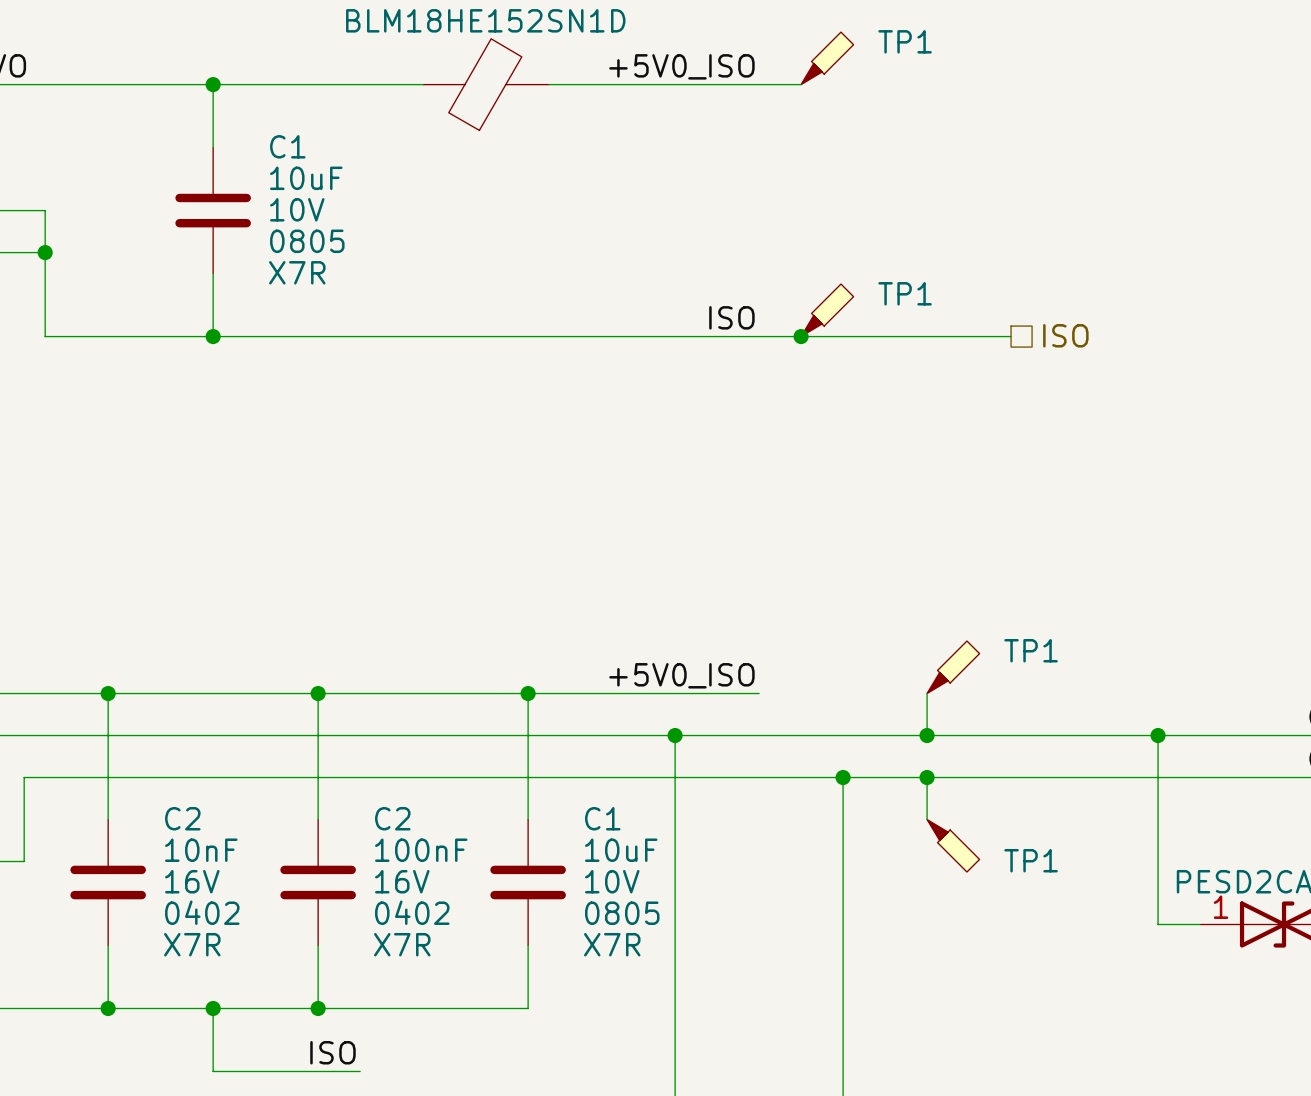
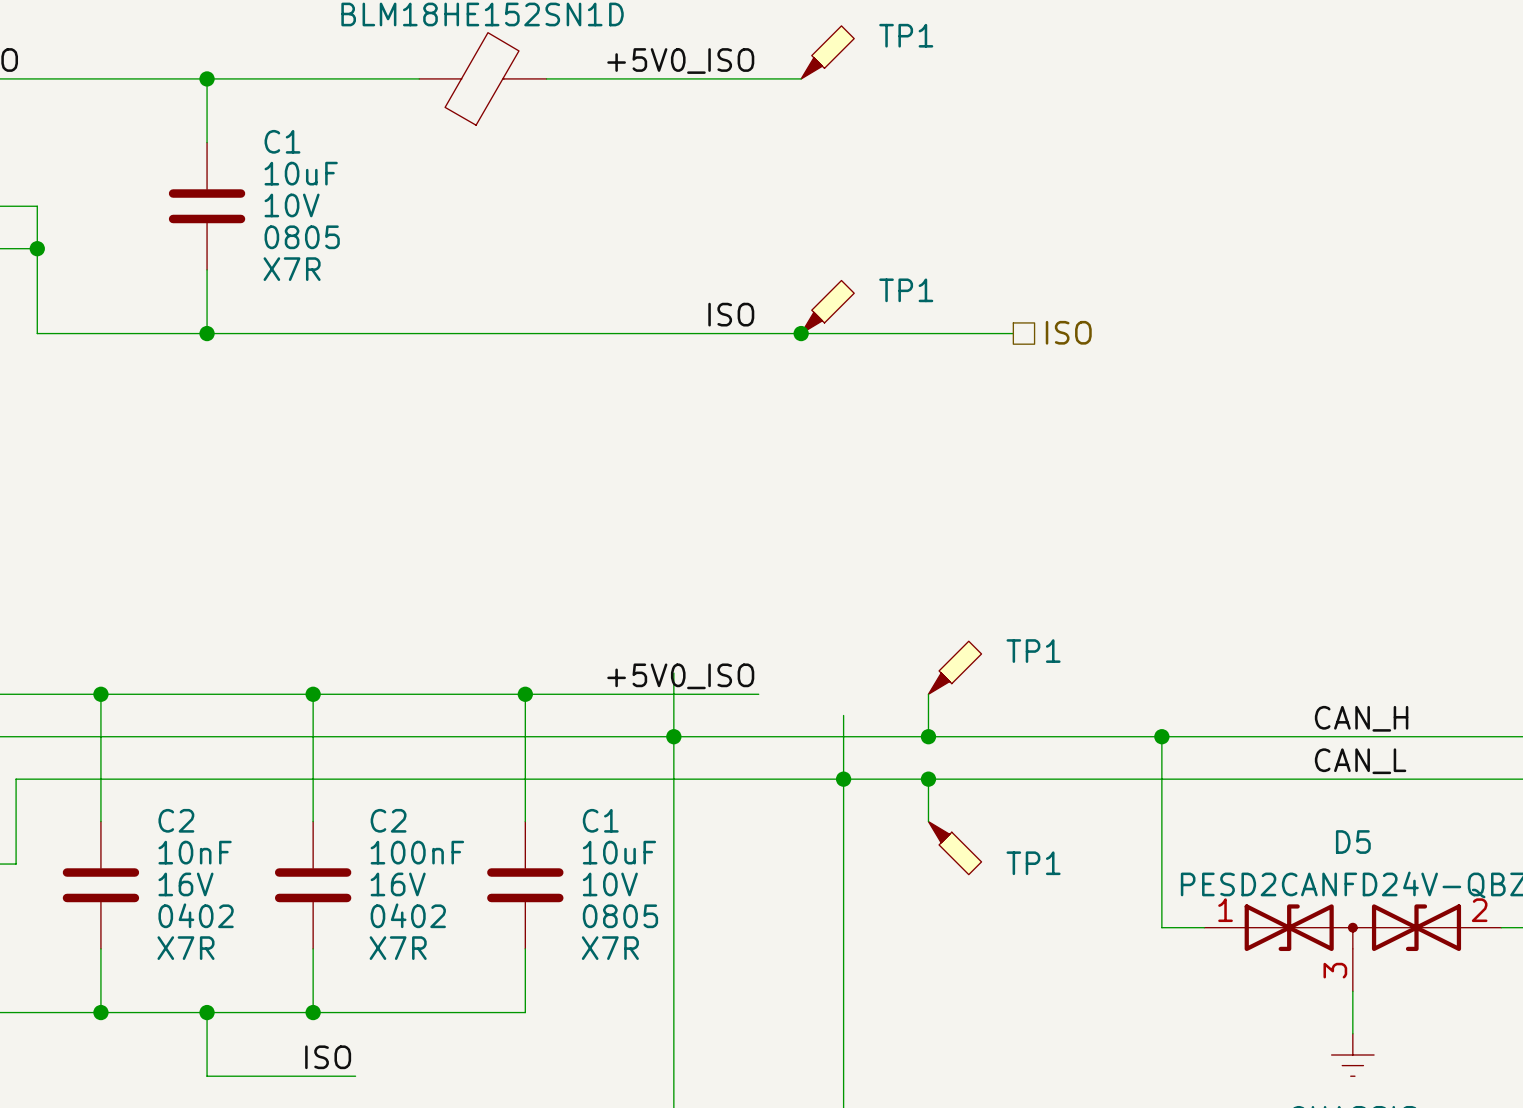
wire: none -> (673, 673) (673, 736)
wire: none -> (843, 715) (843, 779)

